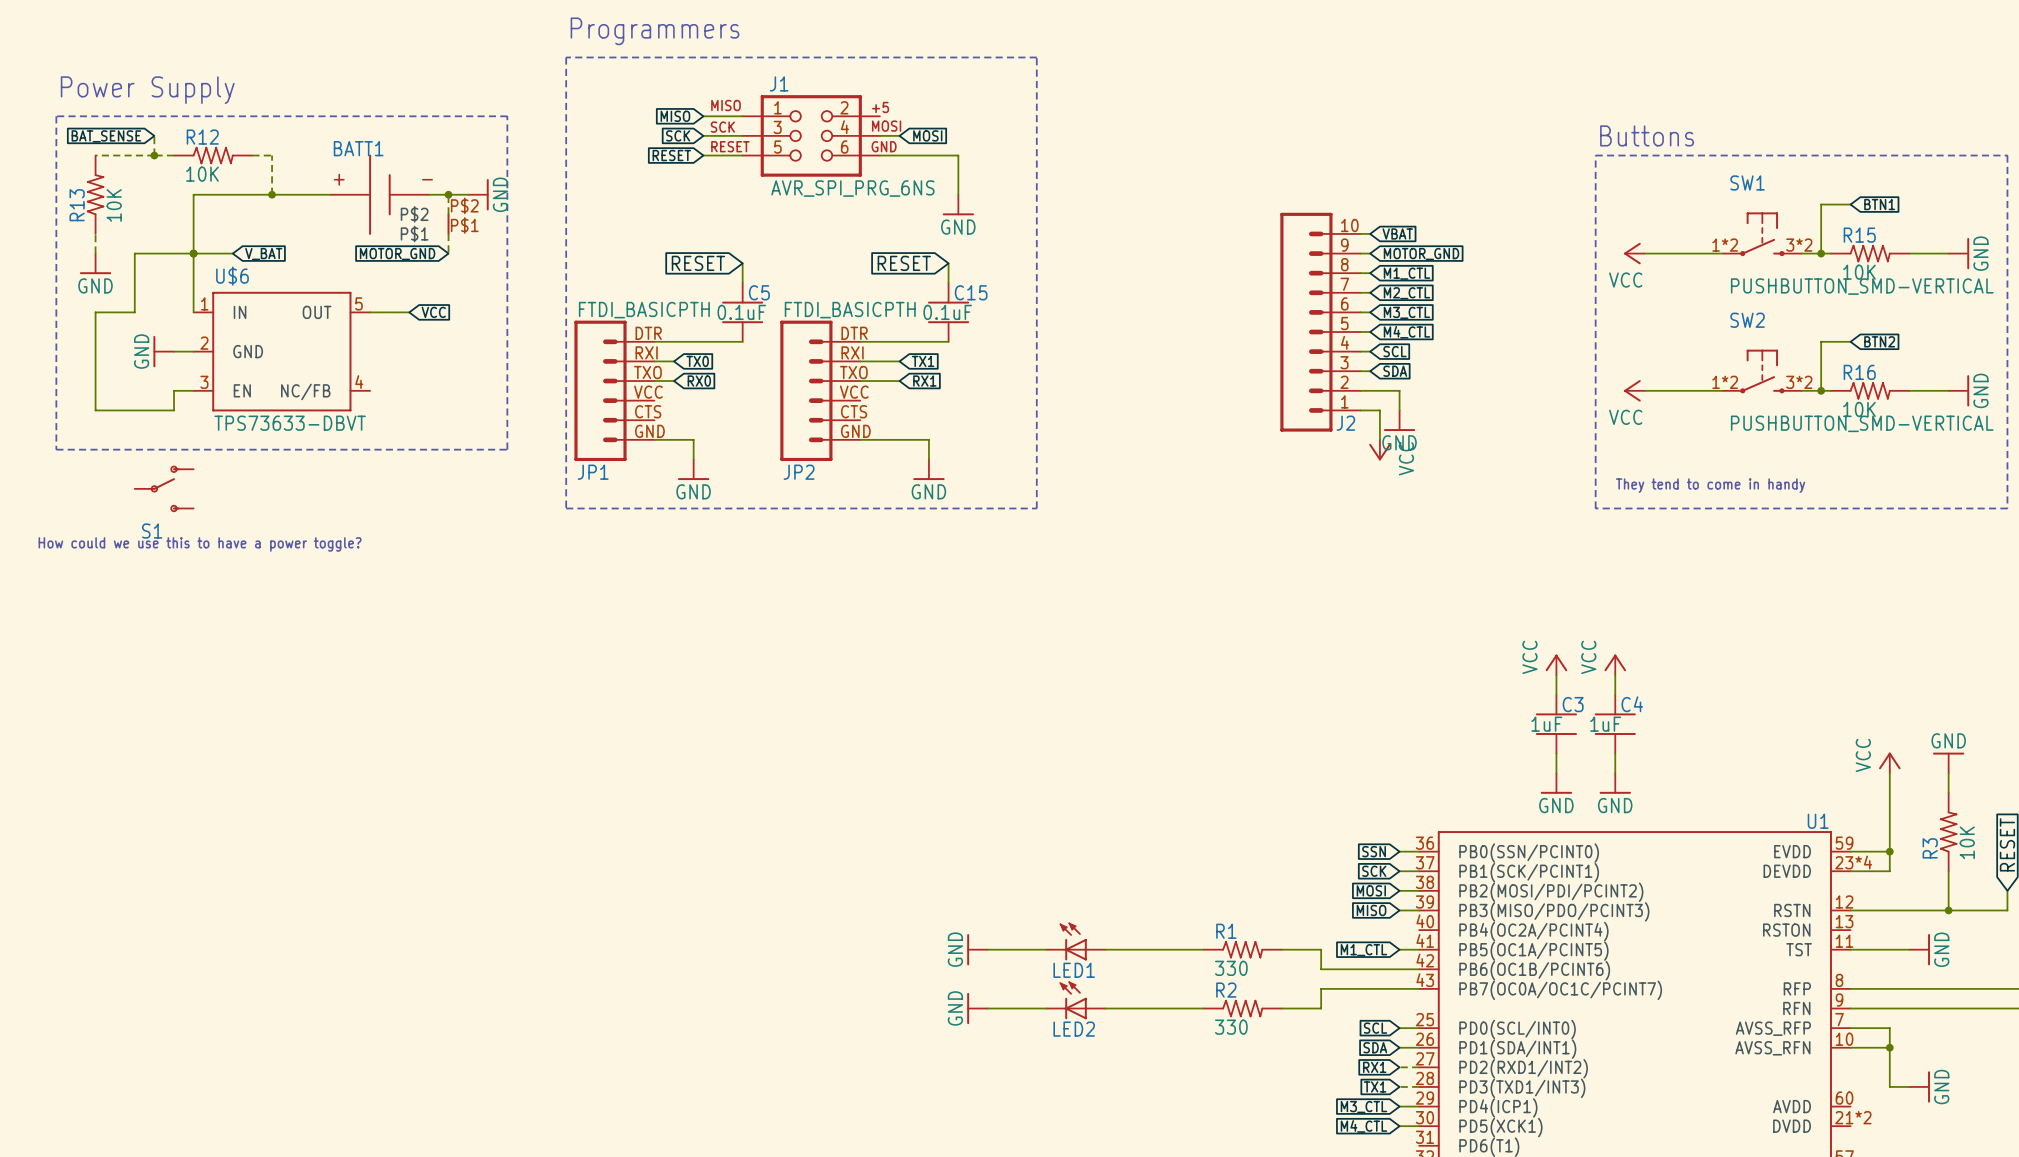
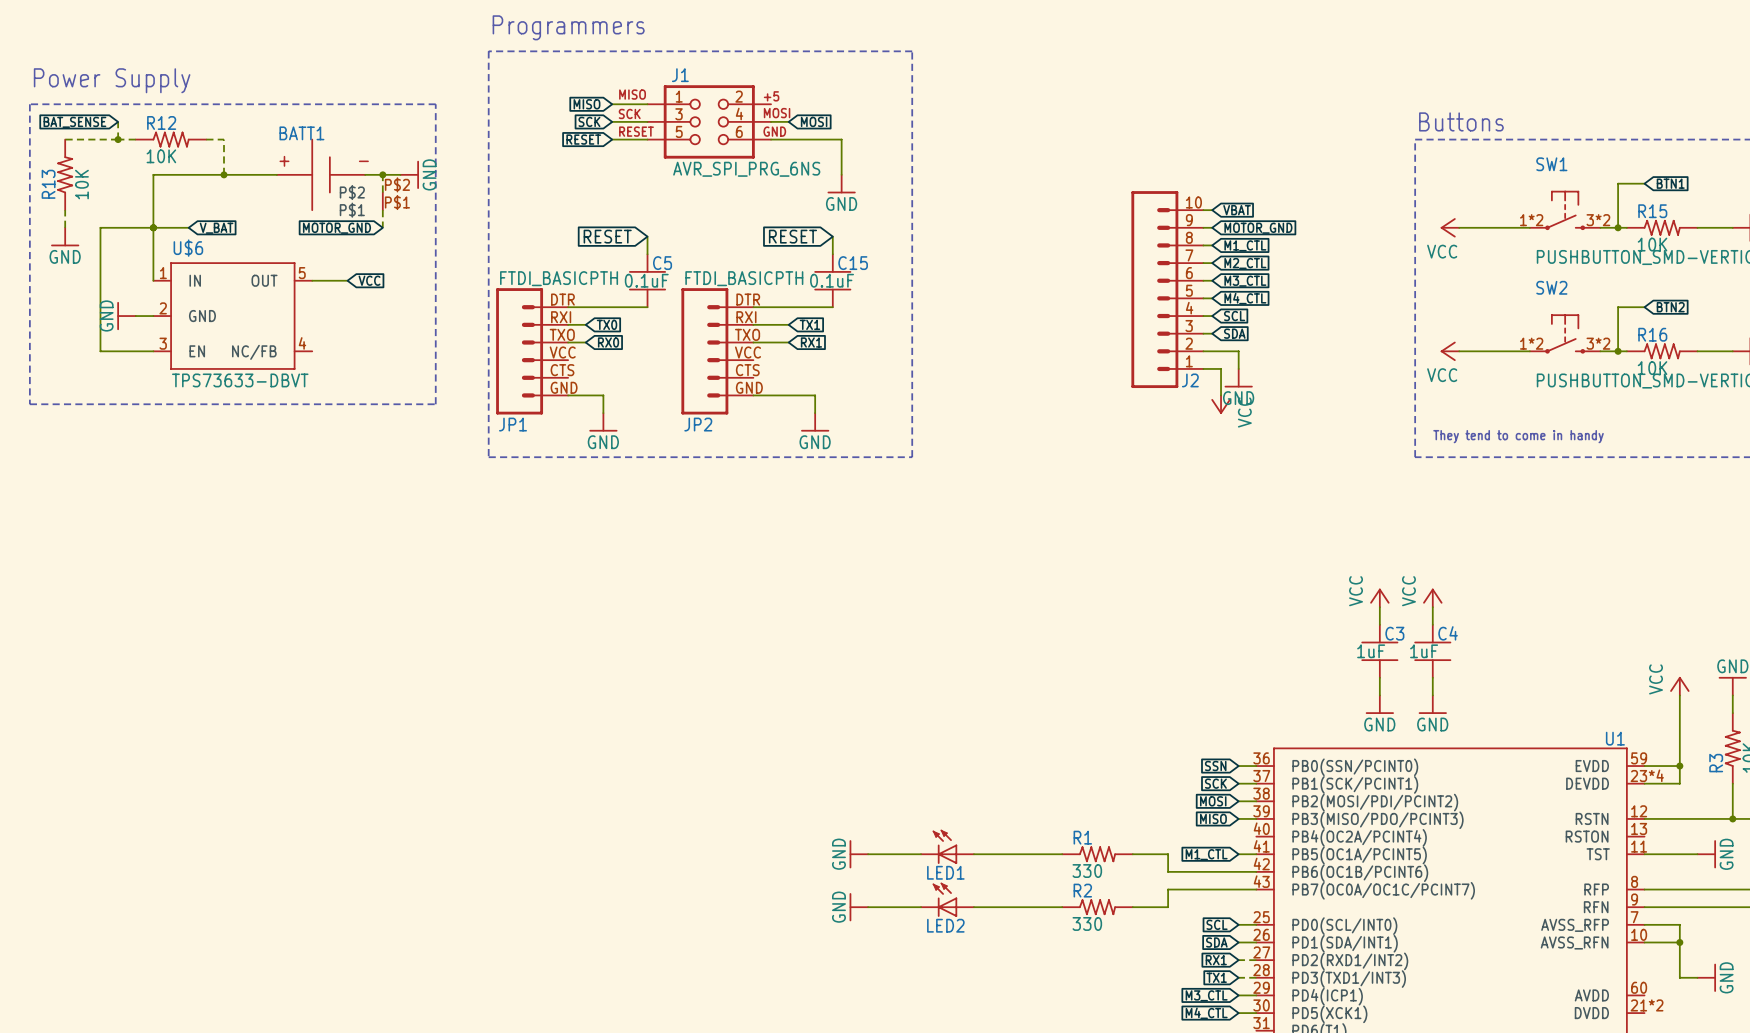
wire: (134, 312) (95, 312) (95, 410) (174, 410) (174, 390) -> (100, 280) (100, 351) (135, 351)
S1: (164, 488) -> none
text: How could we use this to have a power toggle? (200, 544) -> none

